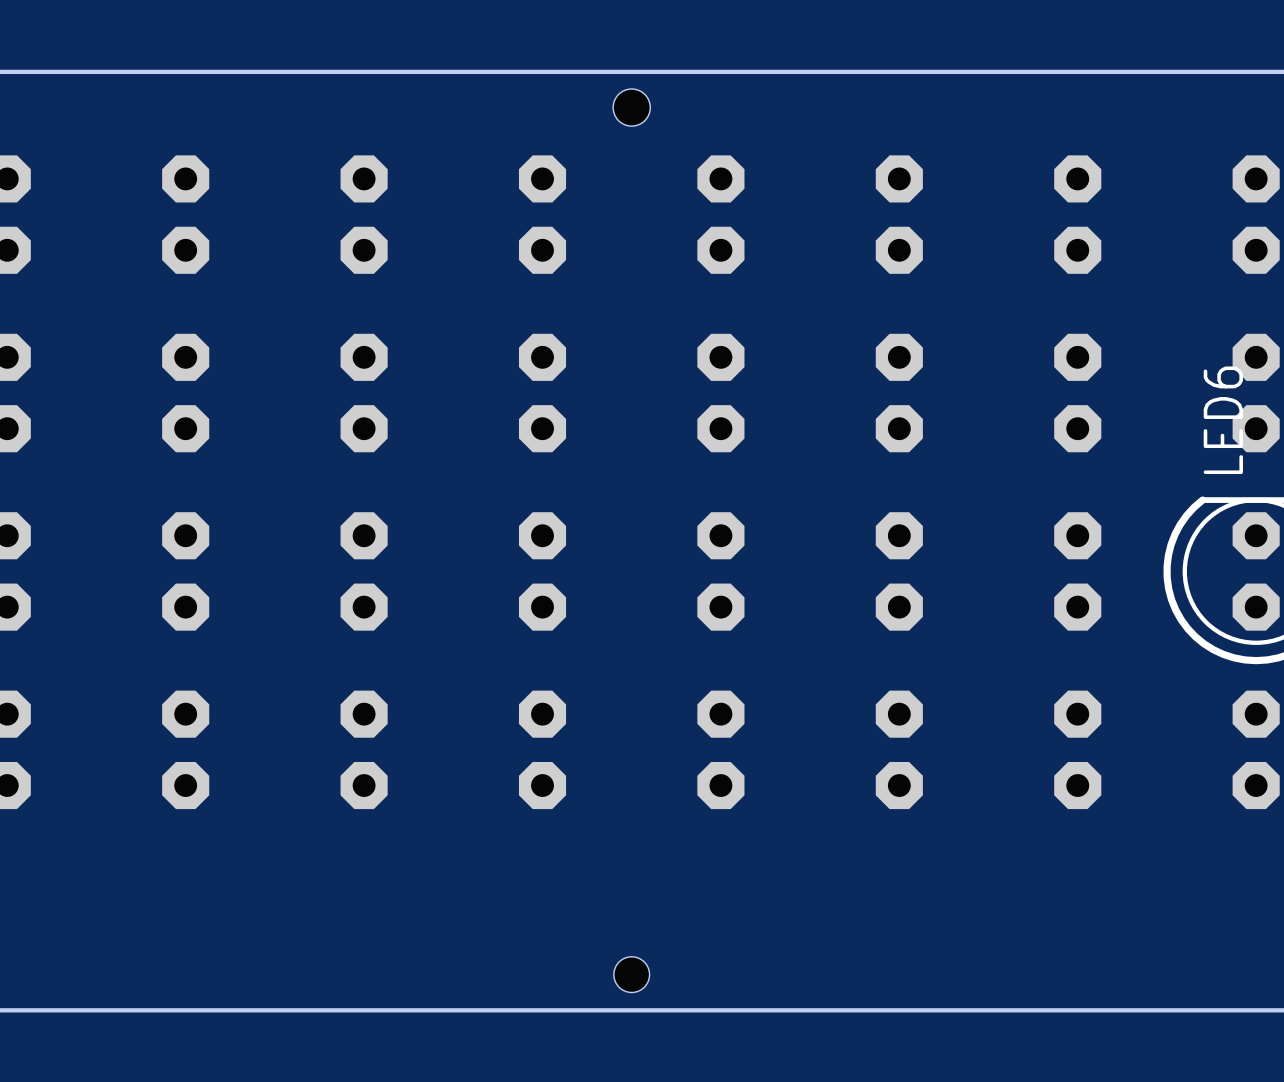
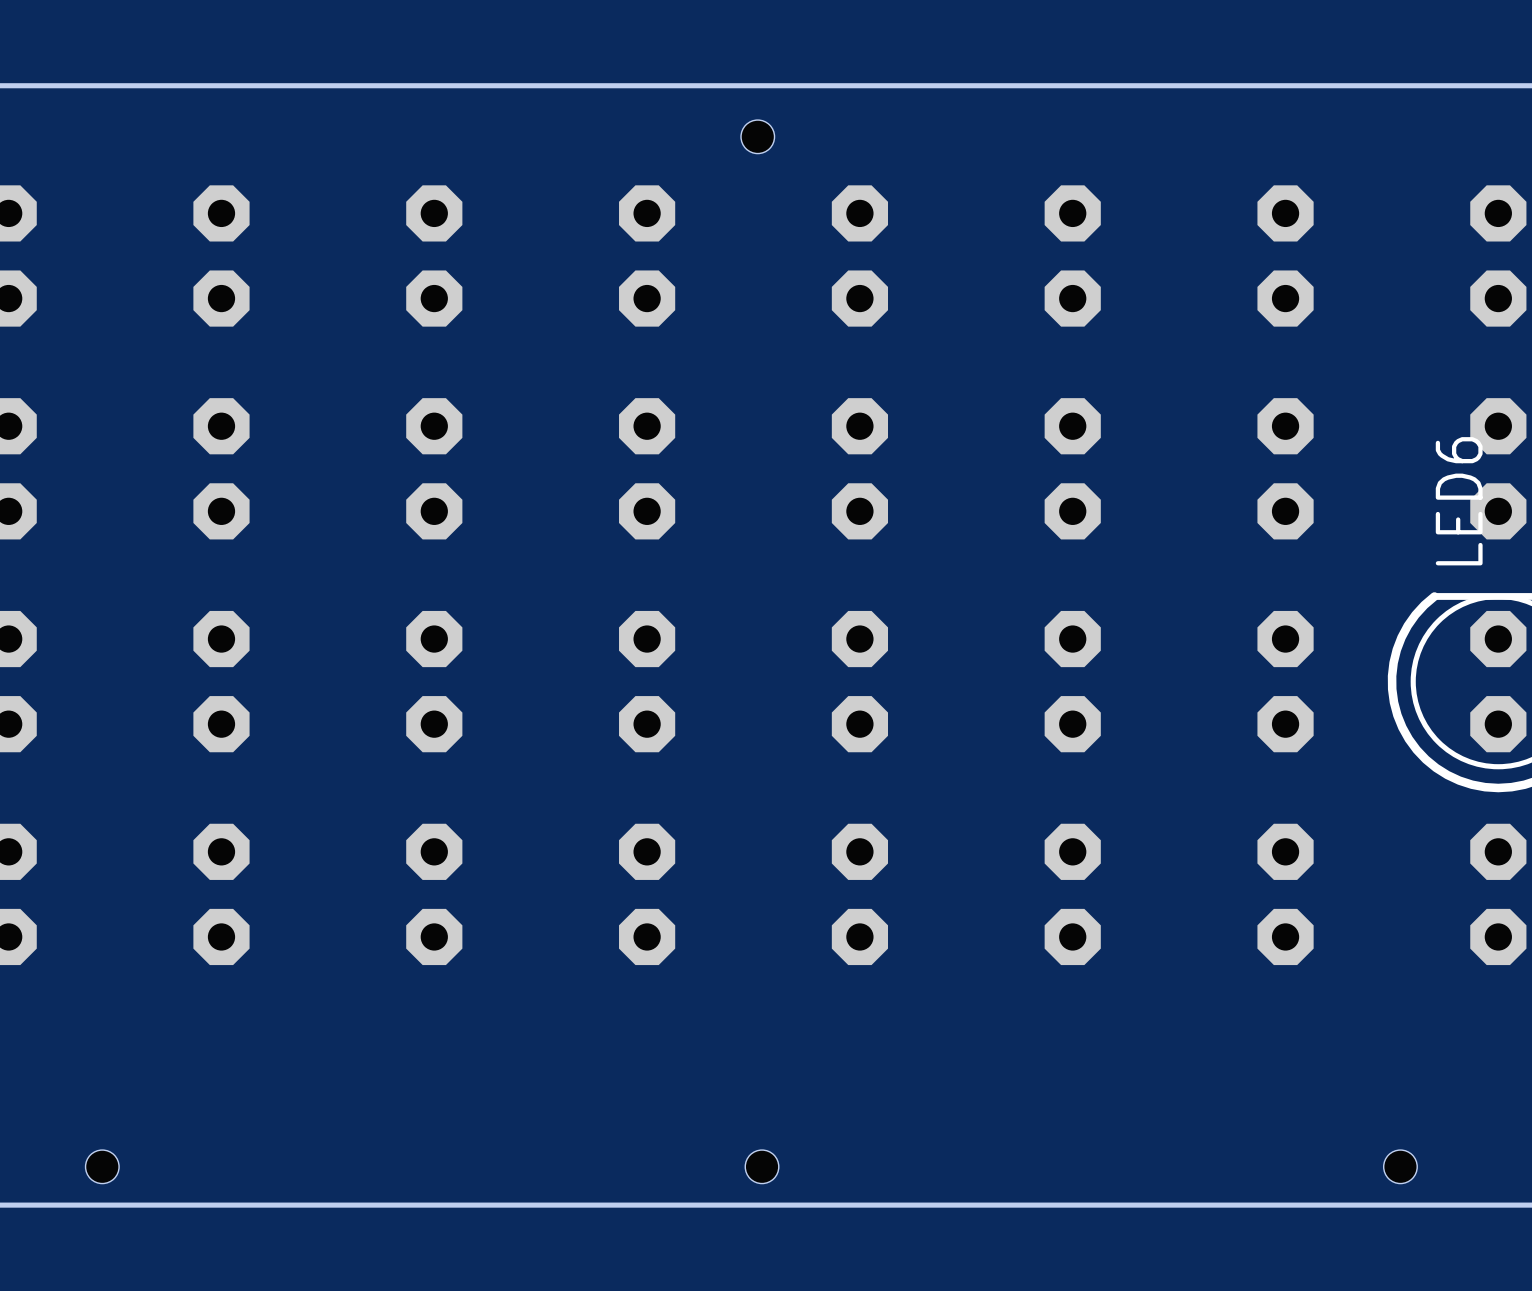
hole size: [613, 89, 651, 127] -> [741, 120, 775, 154]
hole size: [613, 956, 650, 993] -> [745, 1150, 779, 1184]
hole: none -> (102, 1166)
hole: none -> (1400, 1166)

